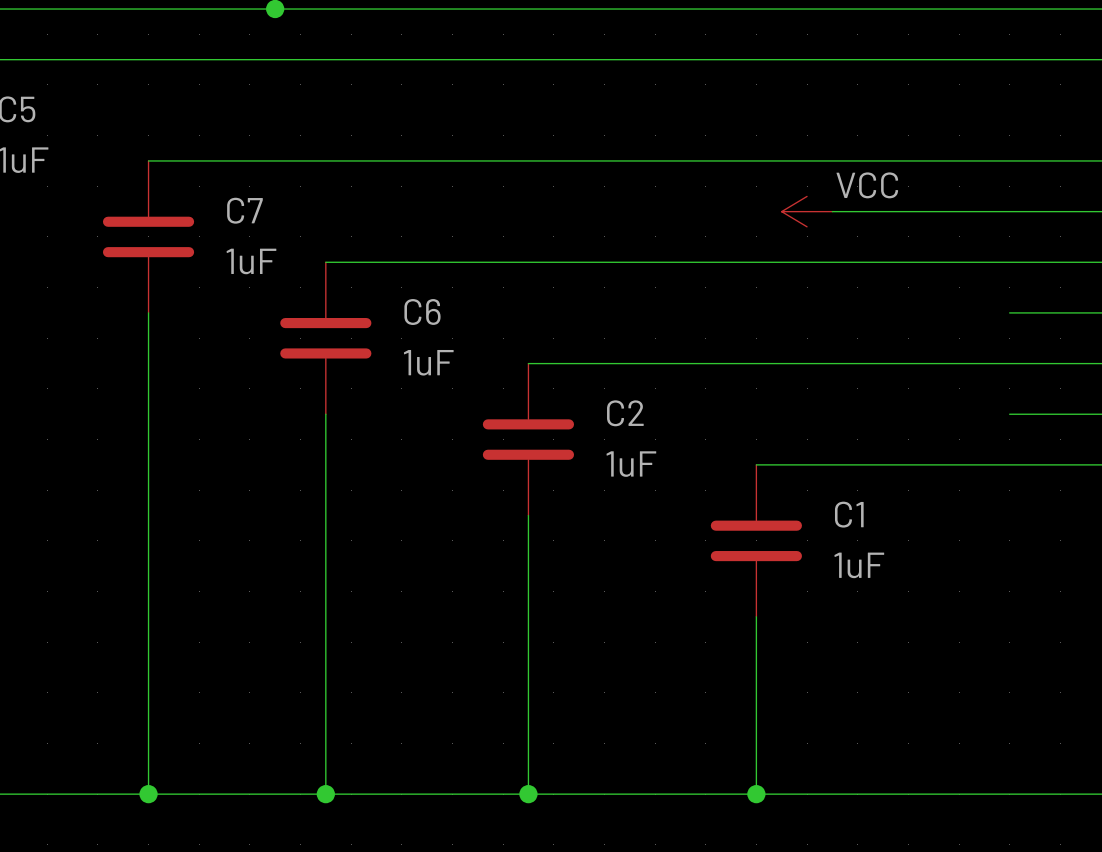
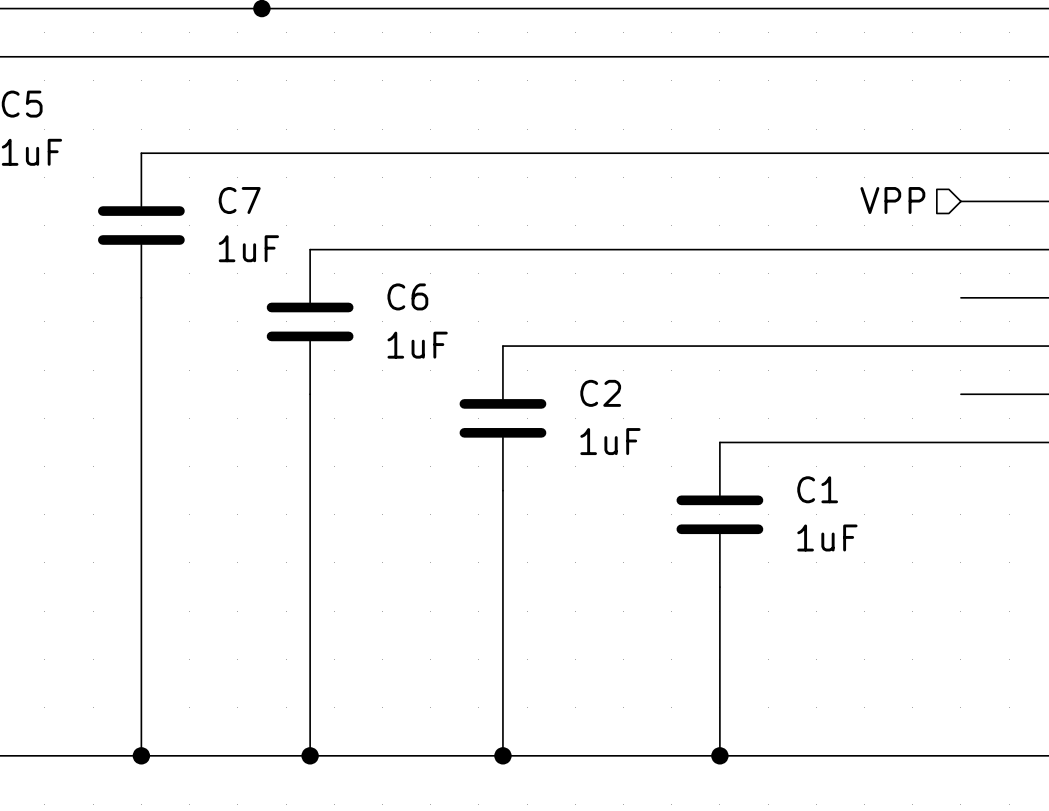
hierarchical label: none -> VPP (892, 200)
power symbol: VCC (807, 211) -> none
wire: (832, 211) (1009, 211) -> none

